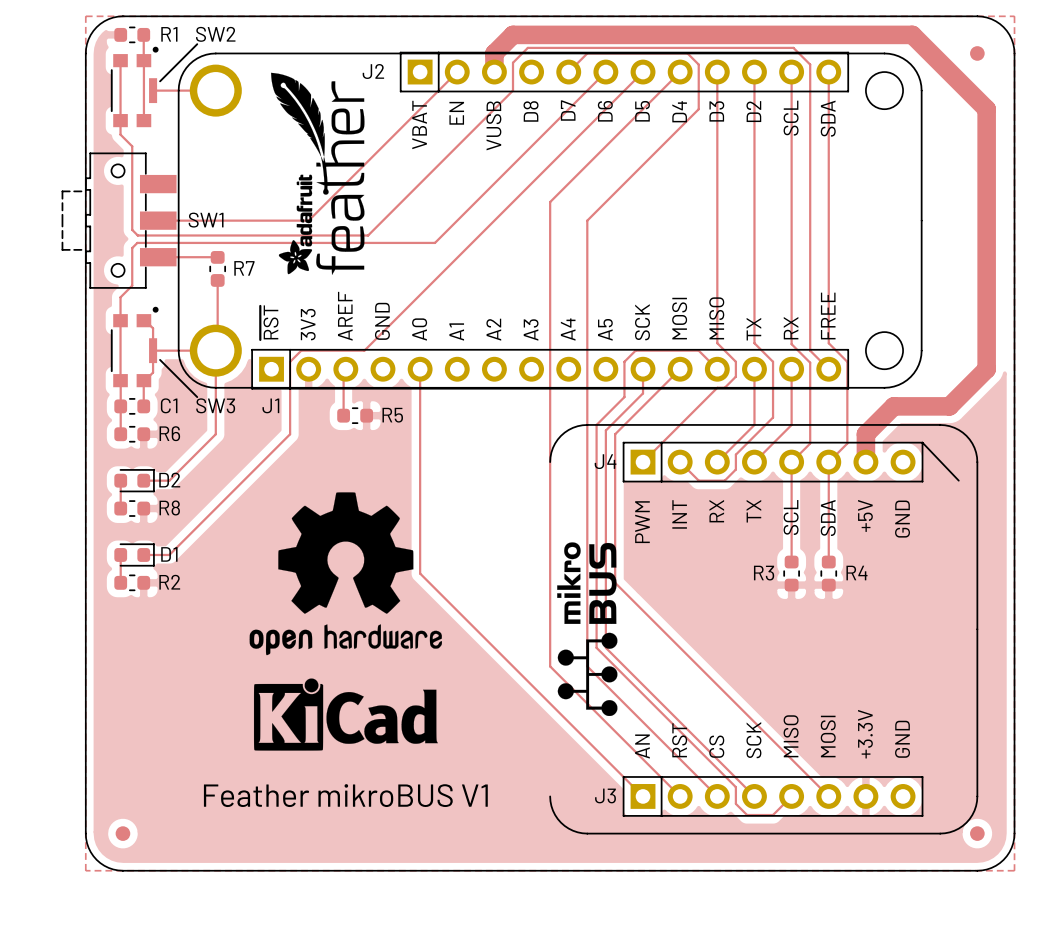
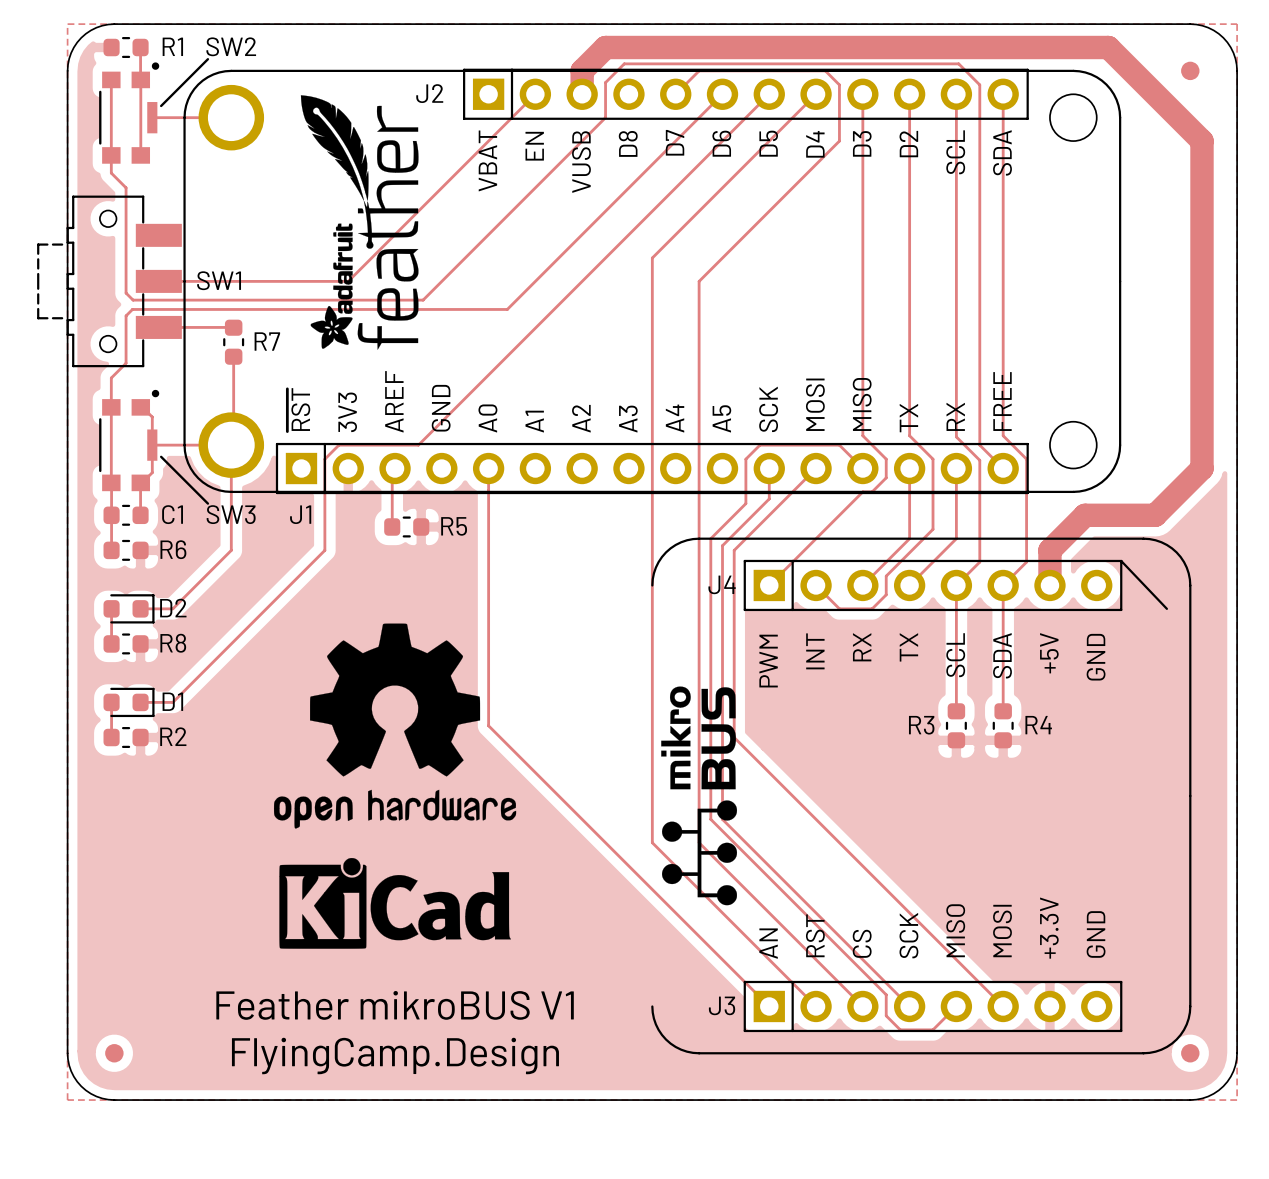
text: none -> FlyingCamp.Design (395, 1056)

